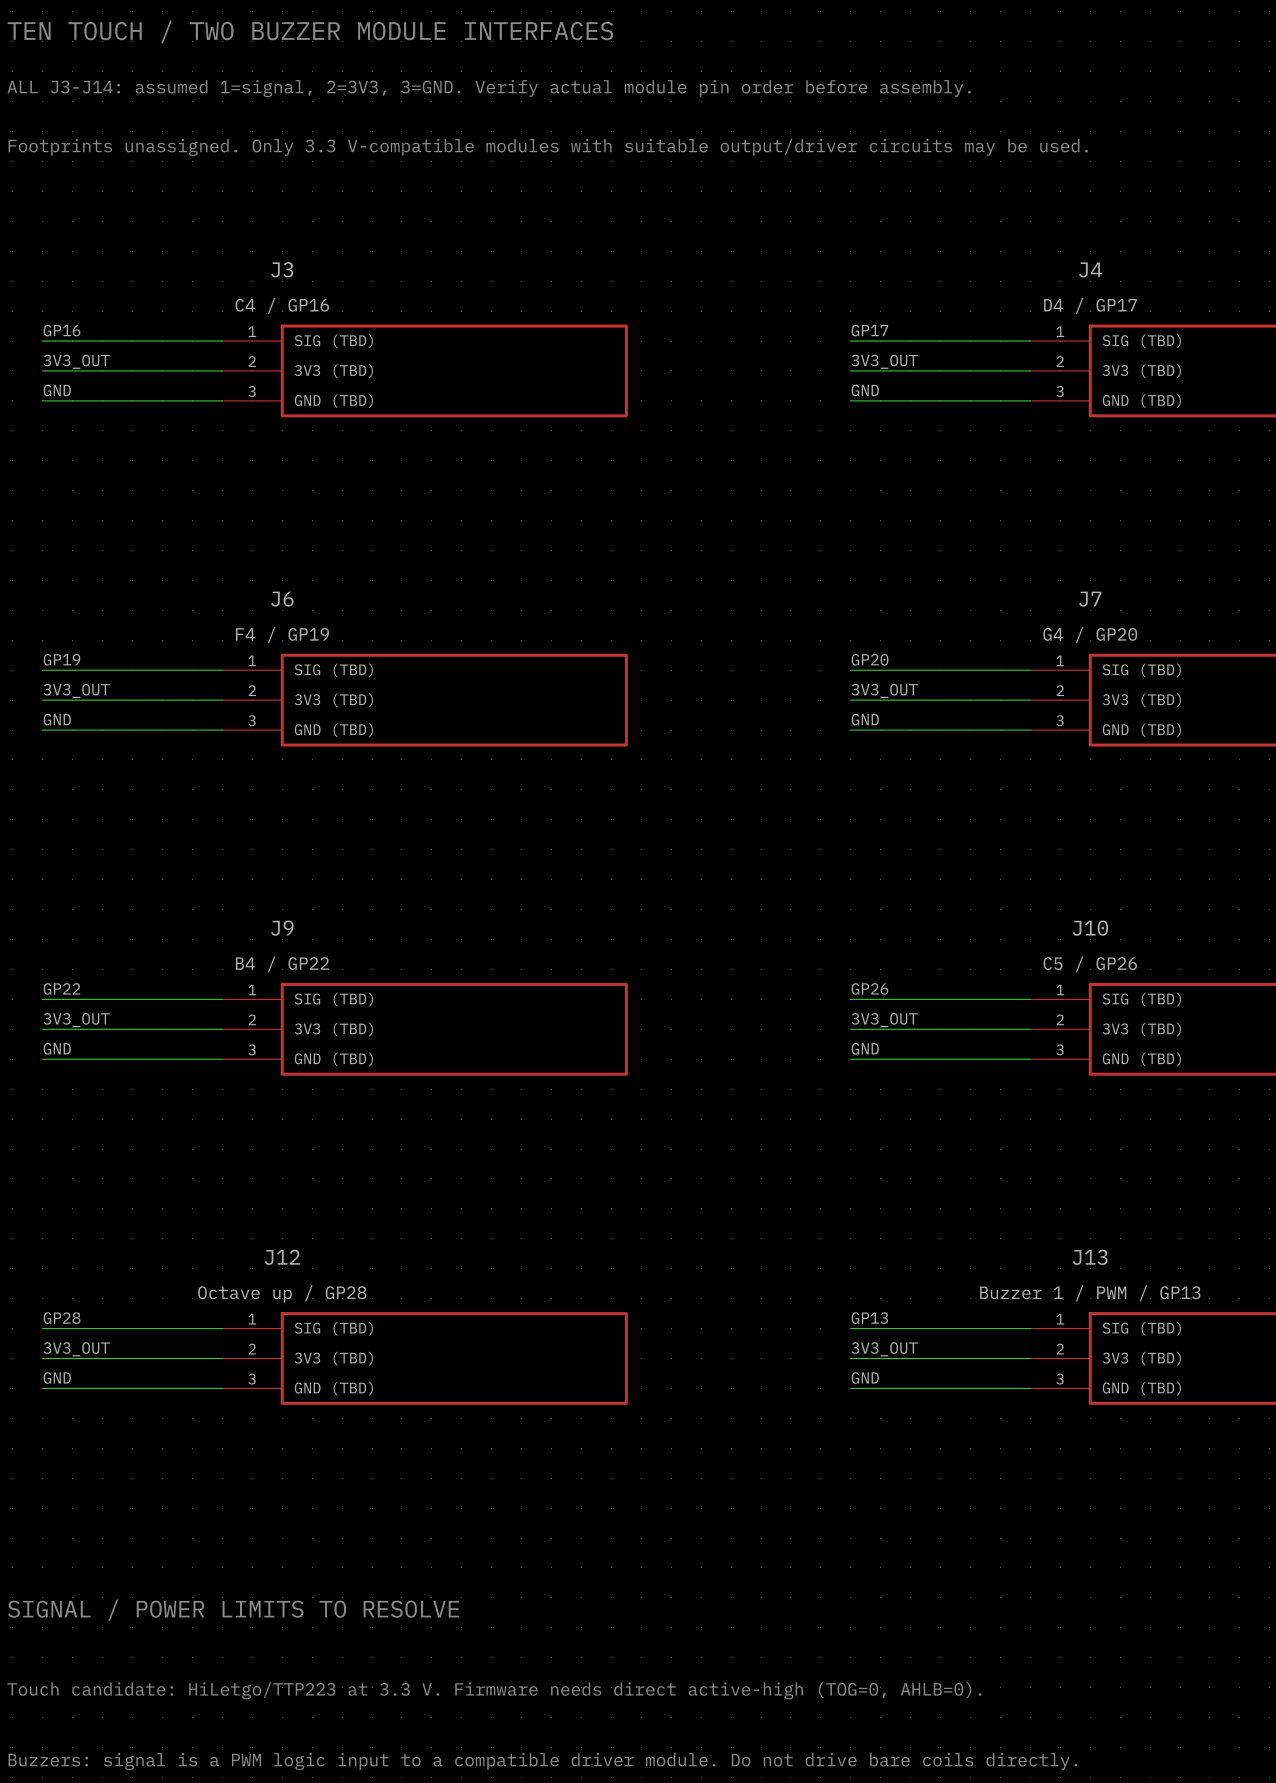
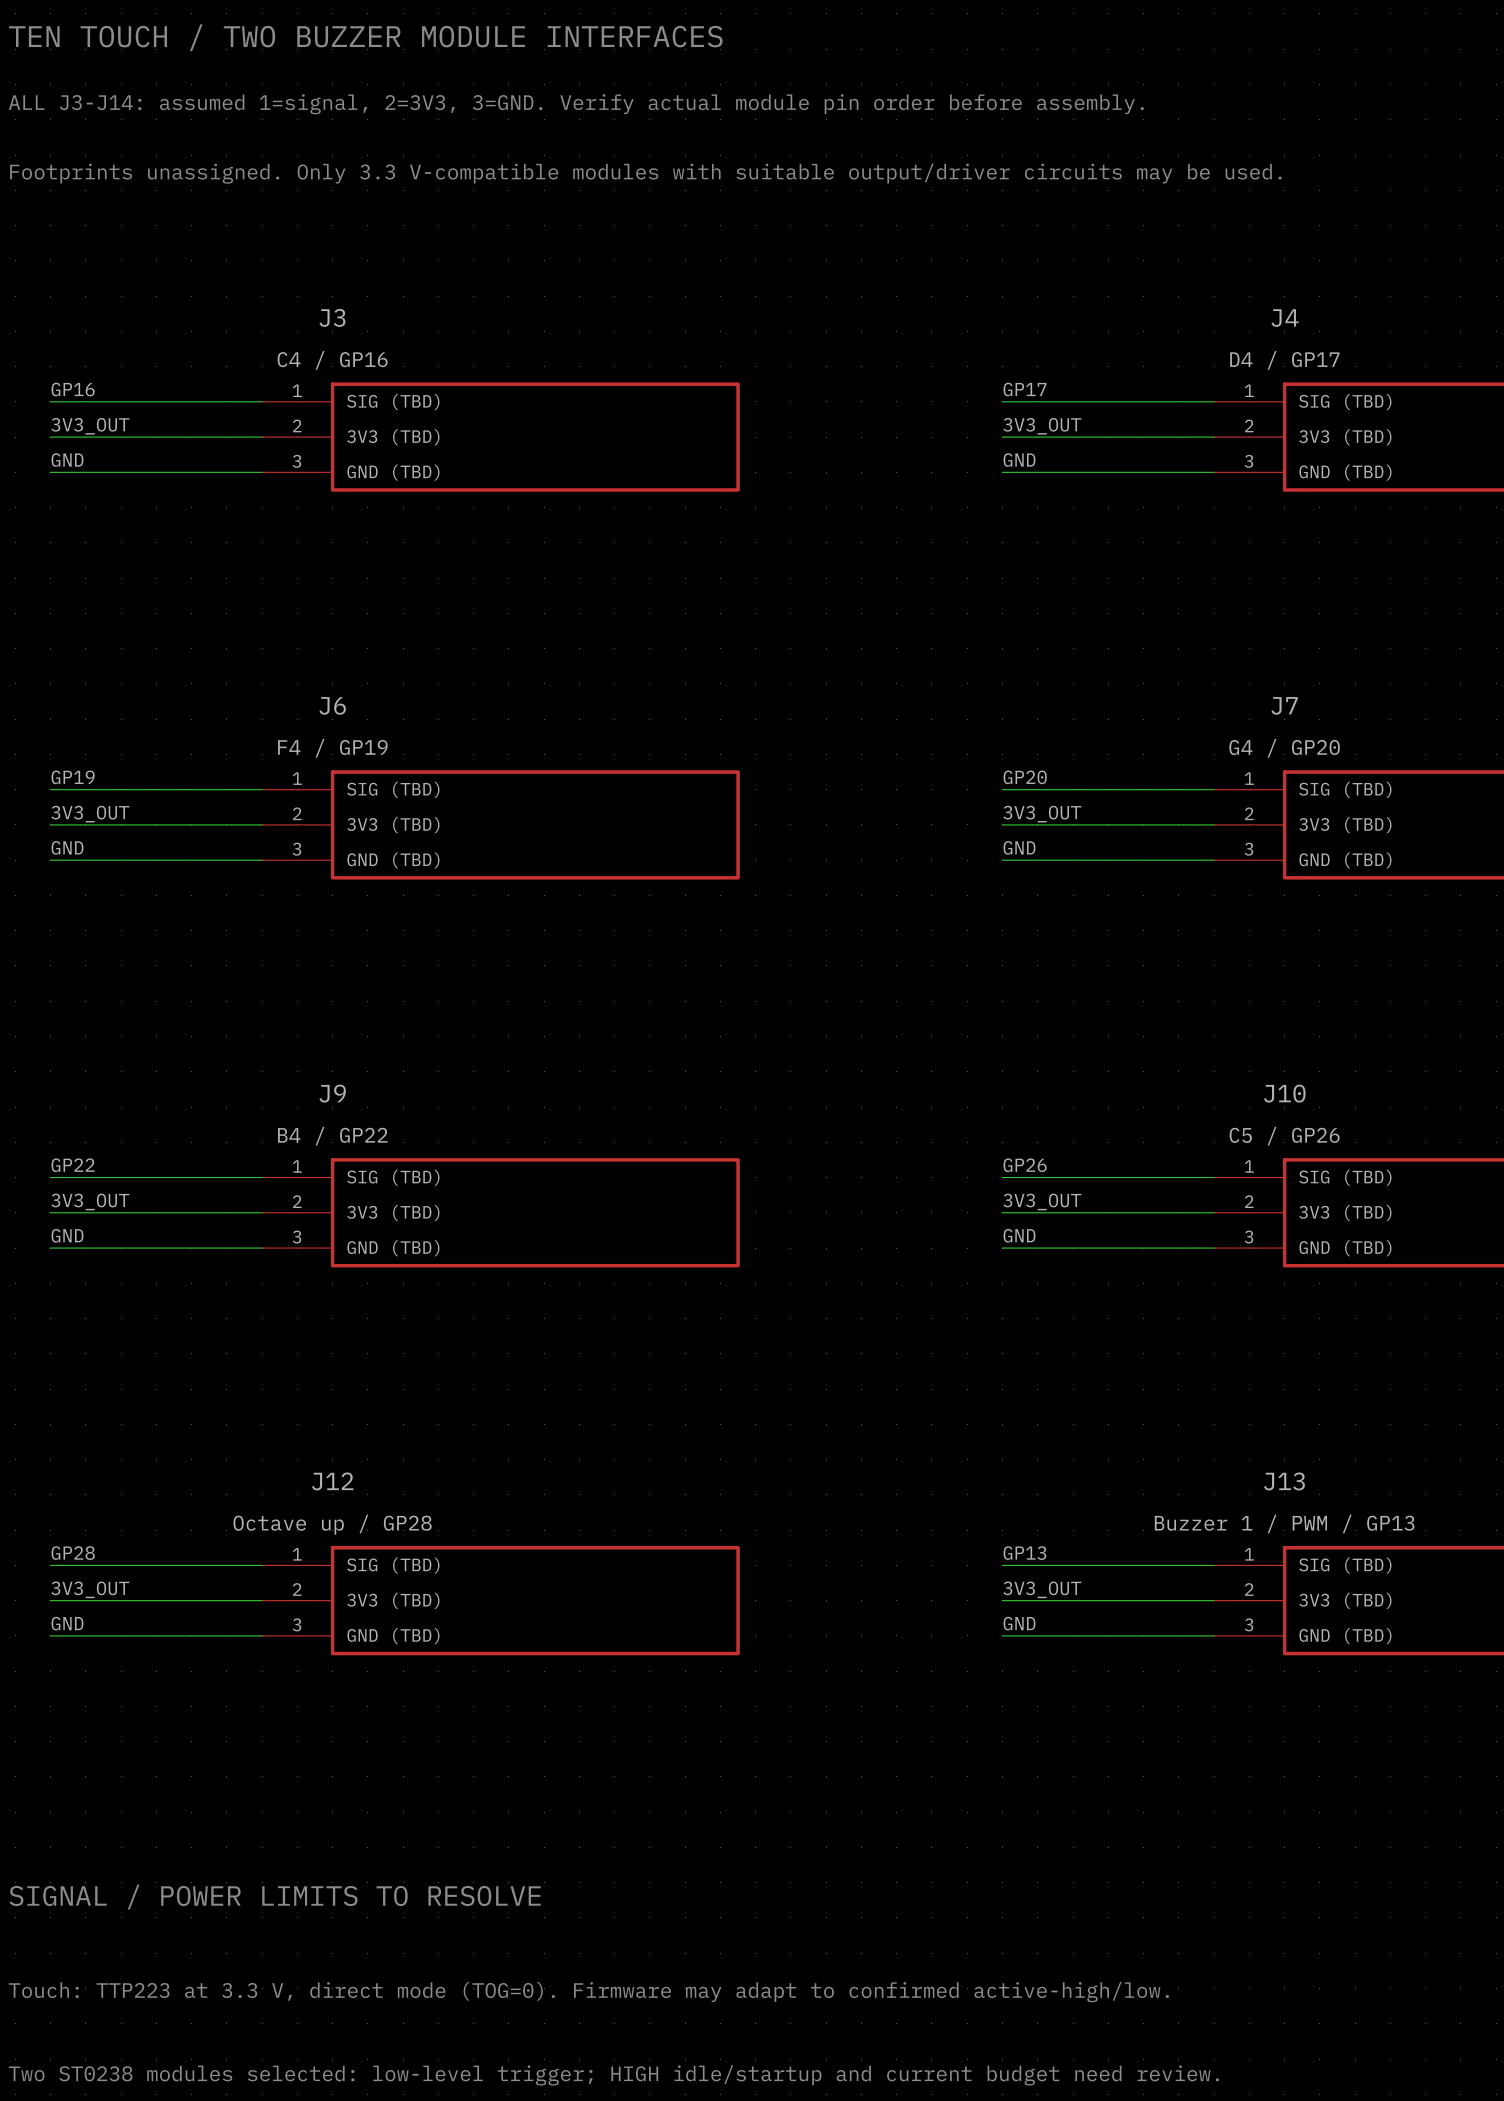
text: Touch candidate: HiLetgo/TTP223 at 3.3 V. Firmware needs direct active-high (TOG=0, AHLB=0). (494, 1690) -> Touch: TTP223 at 3.3 V, direct mode (TOG=0). Firmware may adapt to confirmed active-high/low. (588, 1992)
text: Buzzers: signal is a PWM logic input to a compatible driver module. Do not drive bare coils directly. (542, 1761) -> Two ST0238 modules selected: low-level trigger; HIGH idle/startup and current budget need review. (613, 2075)

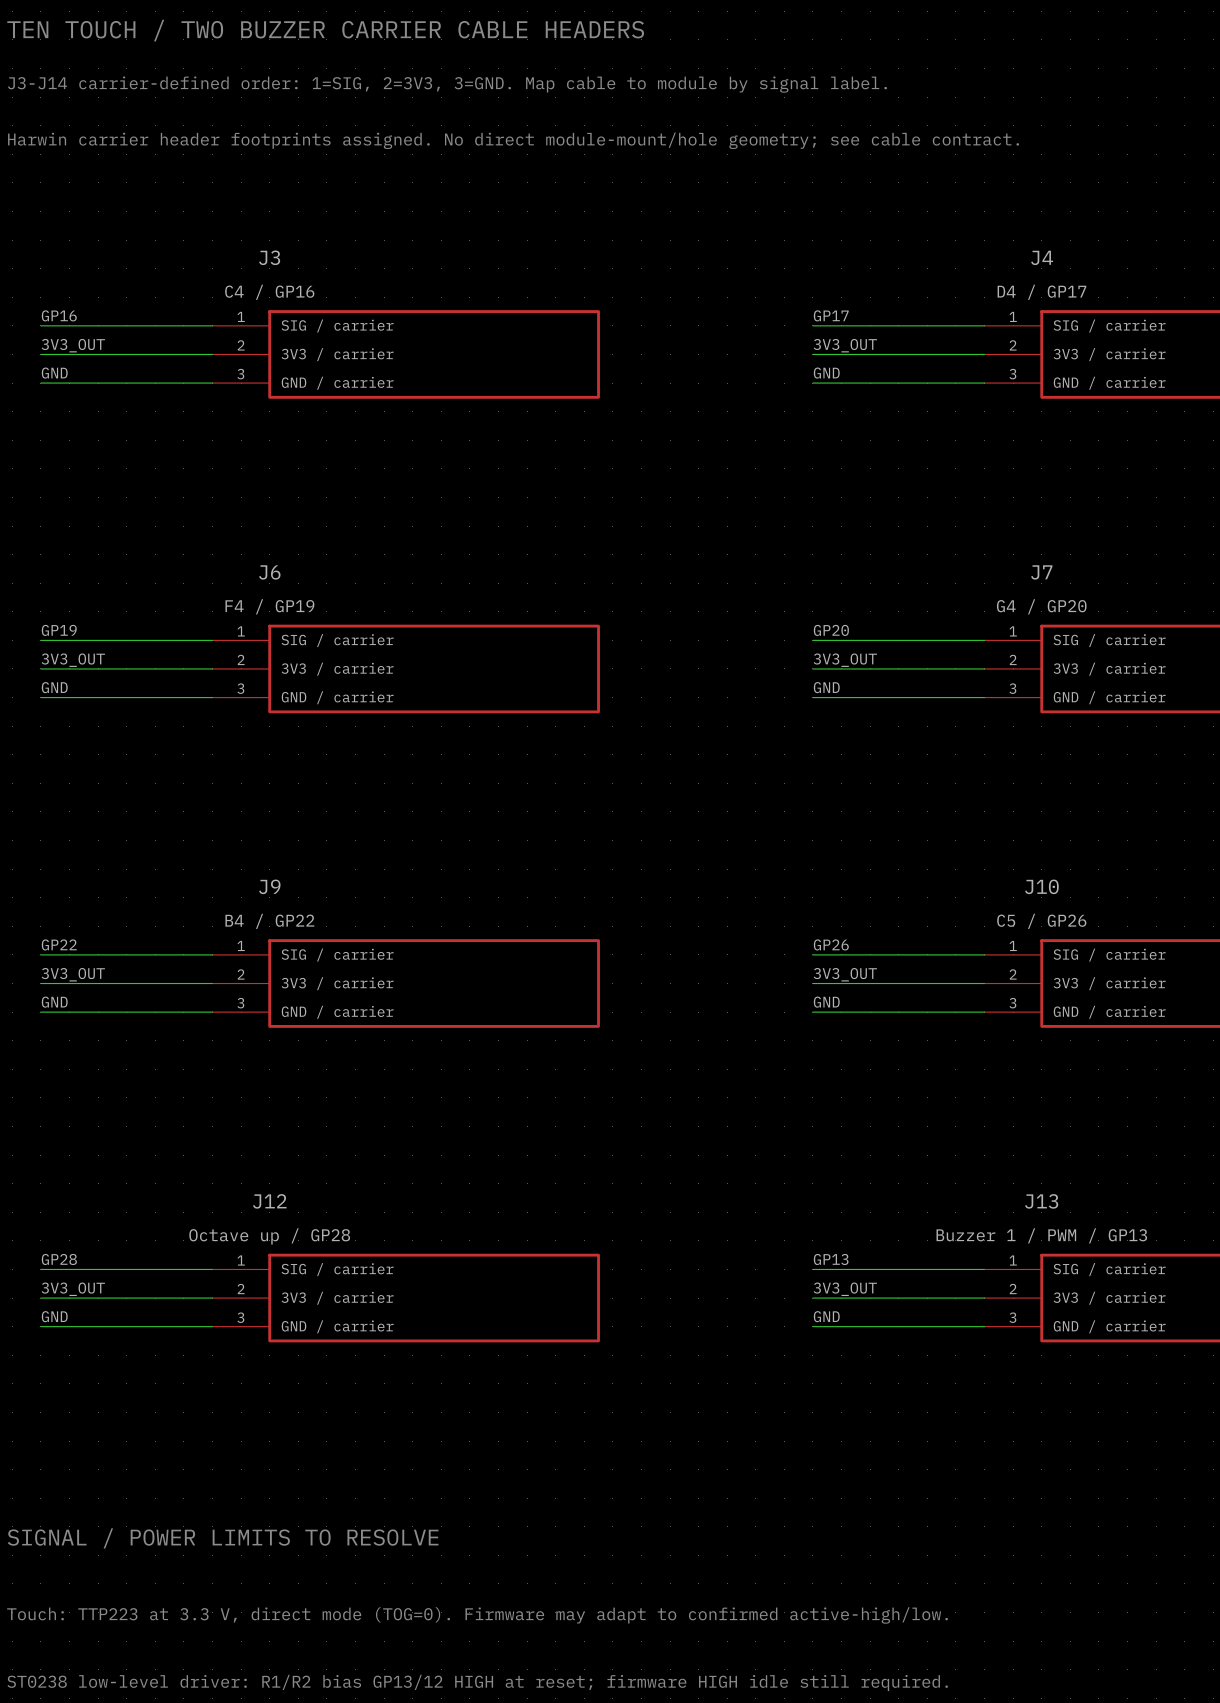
text: TEN TOUCH / TWO BUZZER MODULE INTERFACES (365, 37) -> TEN TOUCH / TWO BUZZER CARRIER CABLE HEADERS (325, 30)
text: ALL J3-J14: assumed 1=signal, 2=3V3, 3=GND. Verify actual module pin order before assembly. (576, 104) -> J3-J14 carrier-defined order: 1=SIG, 2=3V3, 3=GND. Map cable to module by signal label. (447, 84)
text: Footprints unassigned. Only 3.3 V-compatible modules with suitable output/driver circuits may be used. (645, 173) -> Harwin carrier header footprints assigned. No direct module-mount/hole geometry; see cable contract. (513, 140)
J3 pin name: SIG (TBD) (393, 402) -> SIG / carrier (337, 326)
J4 pin name: SIG (TBD) (1345, 402) -> SIG / carrier (1109, 326)
J3 pin name: 3V3 (TBD) (393, 437) -> 3V3 / carrier (337, 354)
J4 pin name: 3V3 (TBD) (1345, 437) -> 3V3 / carrier (1109, 354)
J3 pin name: GND (TBD) (393, 472) -> GND / carrier (337, 383)
J4 pin name: GND (TBD) (1345, 472) -> GND / carrier (1109, 383)
J6 pin name: SIG (TBD) (393, 789) -> SIG / carrier (337, 640)
J7 pin name: SIG (TBD) (1345, 789) -> SIG / carrier (1109, 640)
J6 pin name: 3V3 (TBD) (393, 825) -> 3V3 / carrier (337, 669)
J7 pin name: 3V3 (TBD) (1345, 825) -> 3V3 / carrier (1109, 669)
J6 pin name: GND (TBD) (393, 860) -> GND / carrier (337, 697)
J7 pin name: GND (TBD) (1345, 860) -> GND / carrier (1109, 697)
J9 pin name: SIG (TBD) (393, 1177) -> SIG / carrier (337, 955)
J10 pin name: SIG (TBD) (1345, 1177) -> SIG / carrier (1109, 955)
J9 pin name: 3V3 (TBD) (393, 1213) -> 3V3 / carrier (337, 983)
J10 pin name: 3V3 (TBD) (1345, 1213) -> 3V3 / carrier (1109, 983)
J9 pin name: GND (TBD) (393, 1248) -> GND / carrier (337, 1012)
J10 pin name: GND (TBD) (1345, 1248) -> GND / carrier (1109, 1012)
J12 pin name: SIG (TBD) (393, 1565) -> SIG / carrier (337, 1269)
J13 pin name: SIG (TBD) (1345, 1565) -> SIG / carrier (1109, 1269)
J12 pin name: 3V3 (TBD) (393, 1600) -> 3V3 / carrier (337, 1298)
J13 pin name: 3V3 (TBD) (1345, 1600) -> 3V3 / carrier (1109, 1298)
J12 pin name: GND (TBD) (393, 1636) -> GND / carrier (337, 1326)
J13 pin name: GND (TBD) (1345, 1636) -> GND / carrier (1109, 1326)
text: Two ST0238 modules selected: low-level trigger; HIGH idle/startup and current budget need review. (613, 2075) -> ST0238 low-level driver: R1/R2 bias GP13/12 HIGH at reset; firmware HIGH idle still required. (477, 1682)

